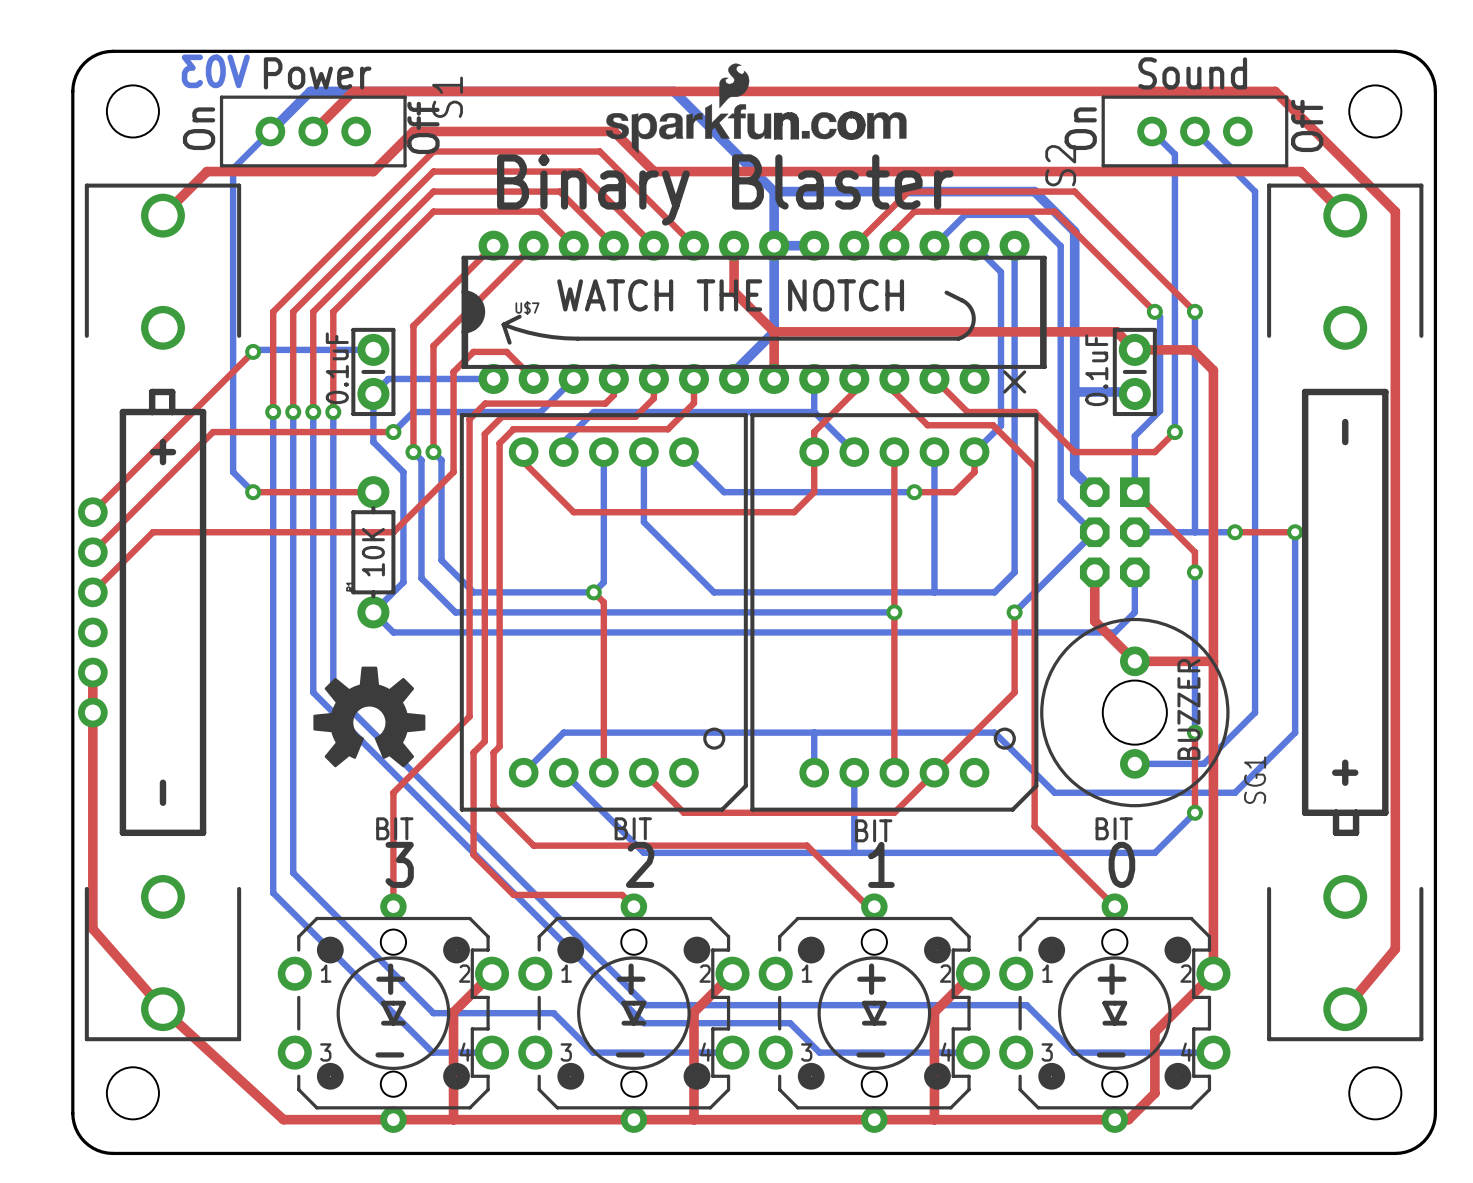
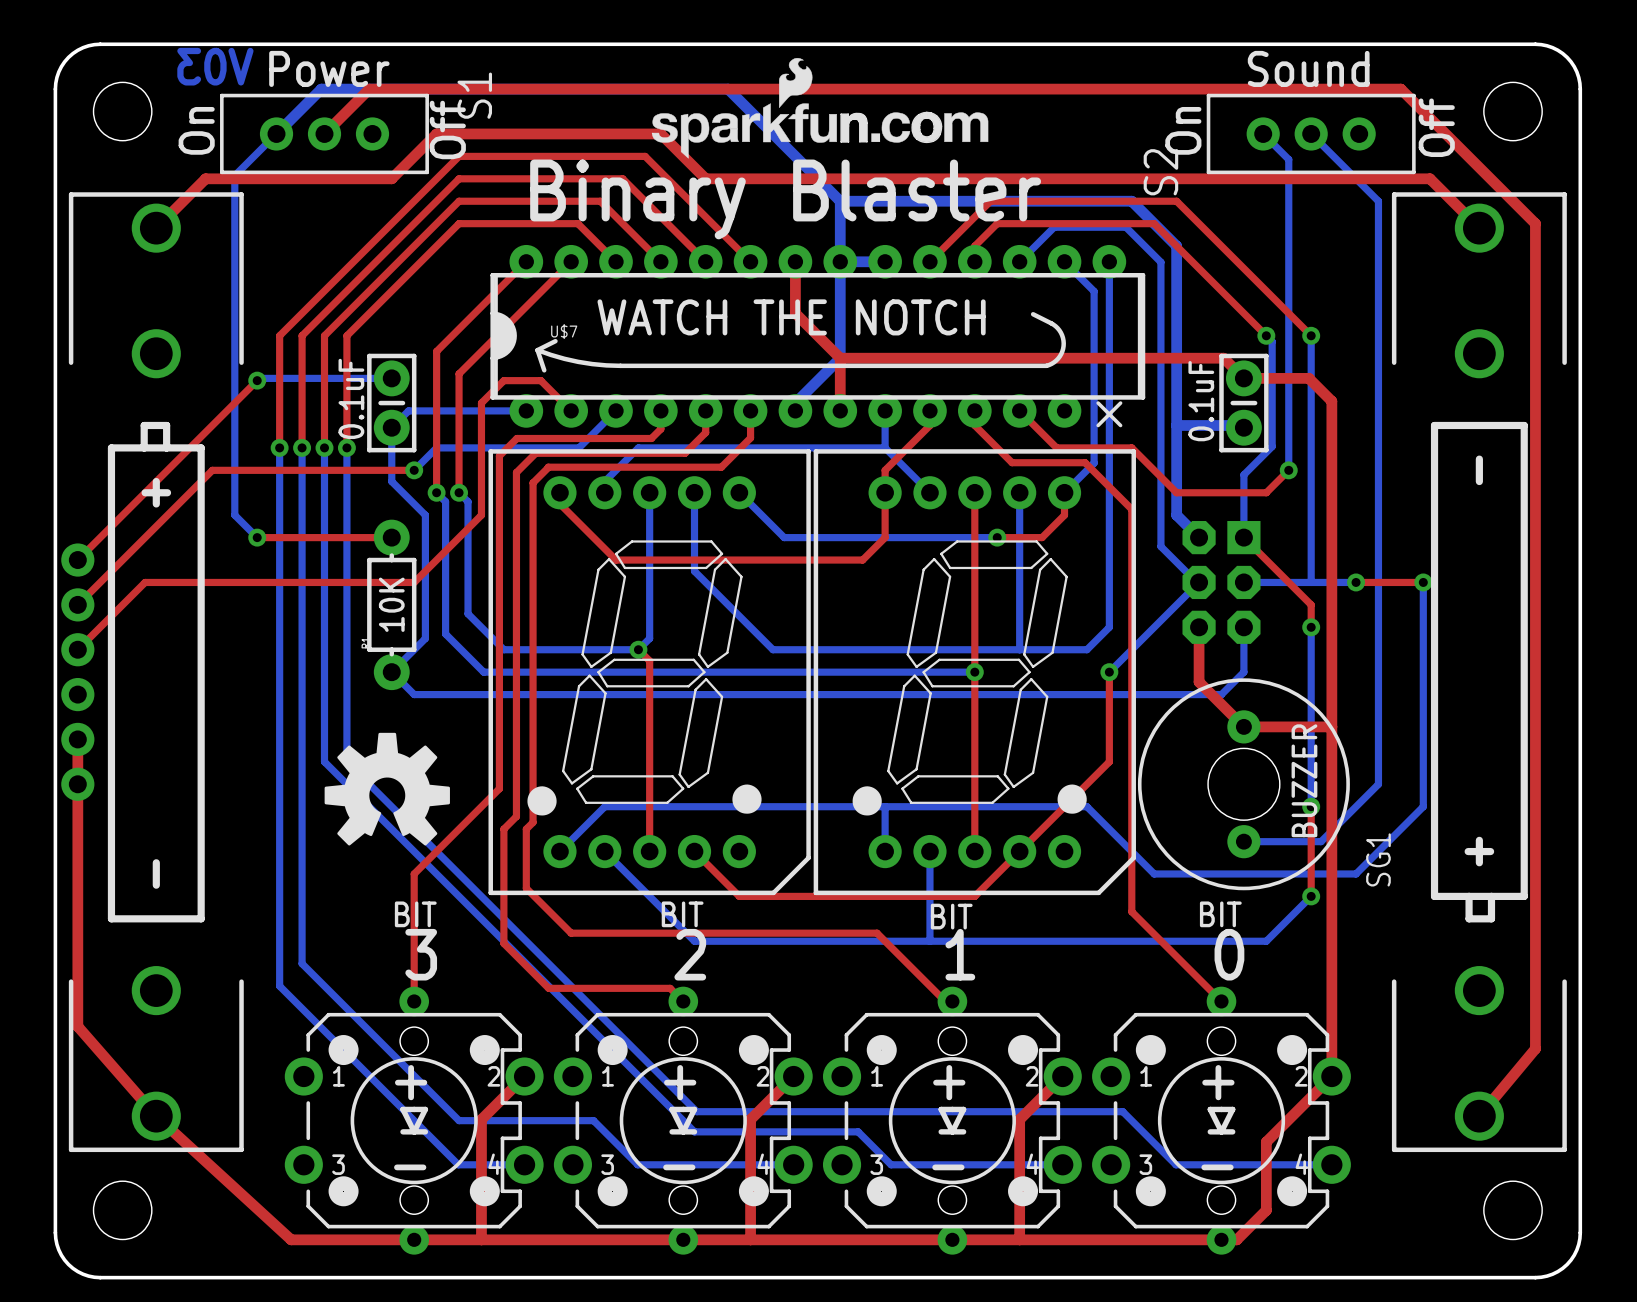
part footprint: [459, 413, 748, 812] -> [488, 449, 811, 896]
part footprint: [750, 413, 1039, 812] -> [813, 449, 1136, 896]

